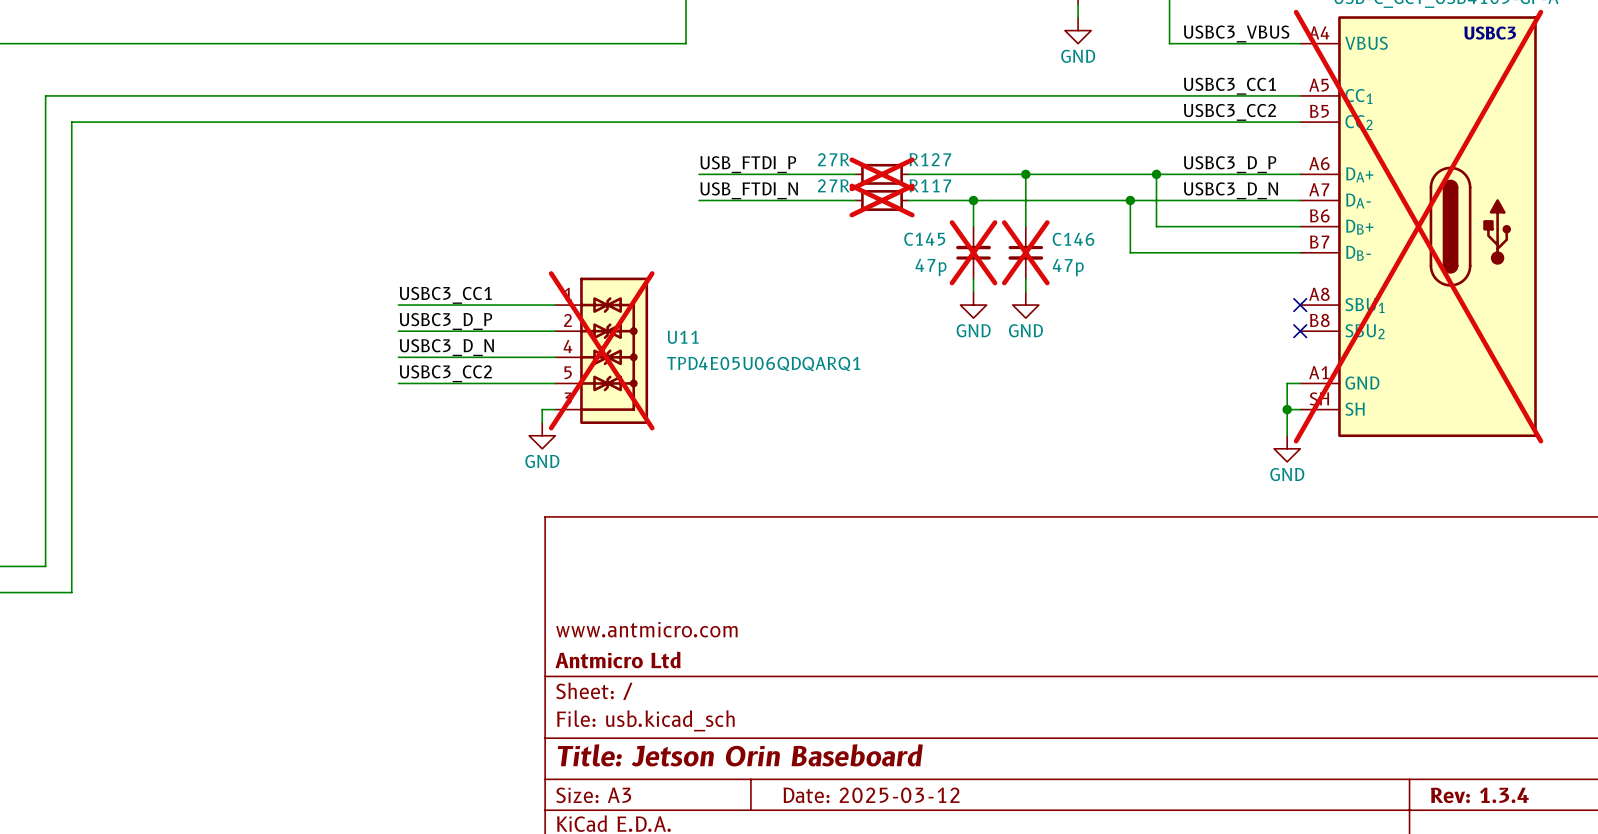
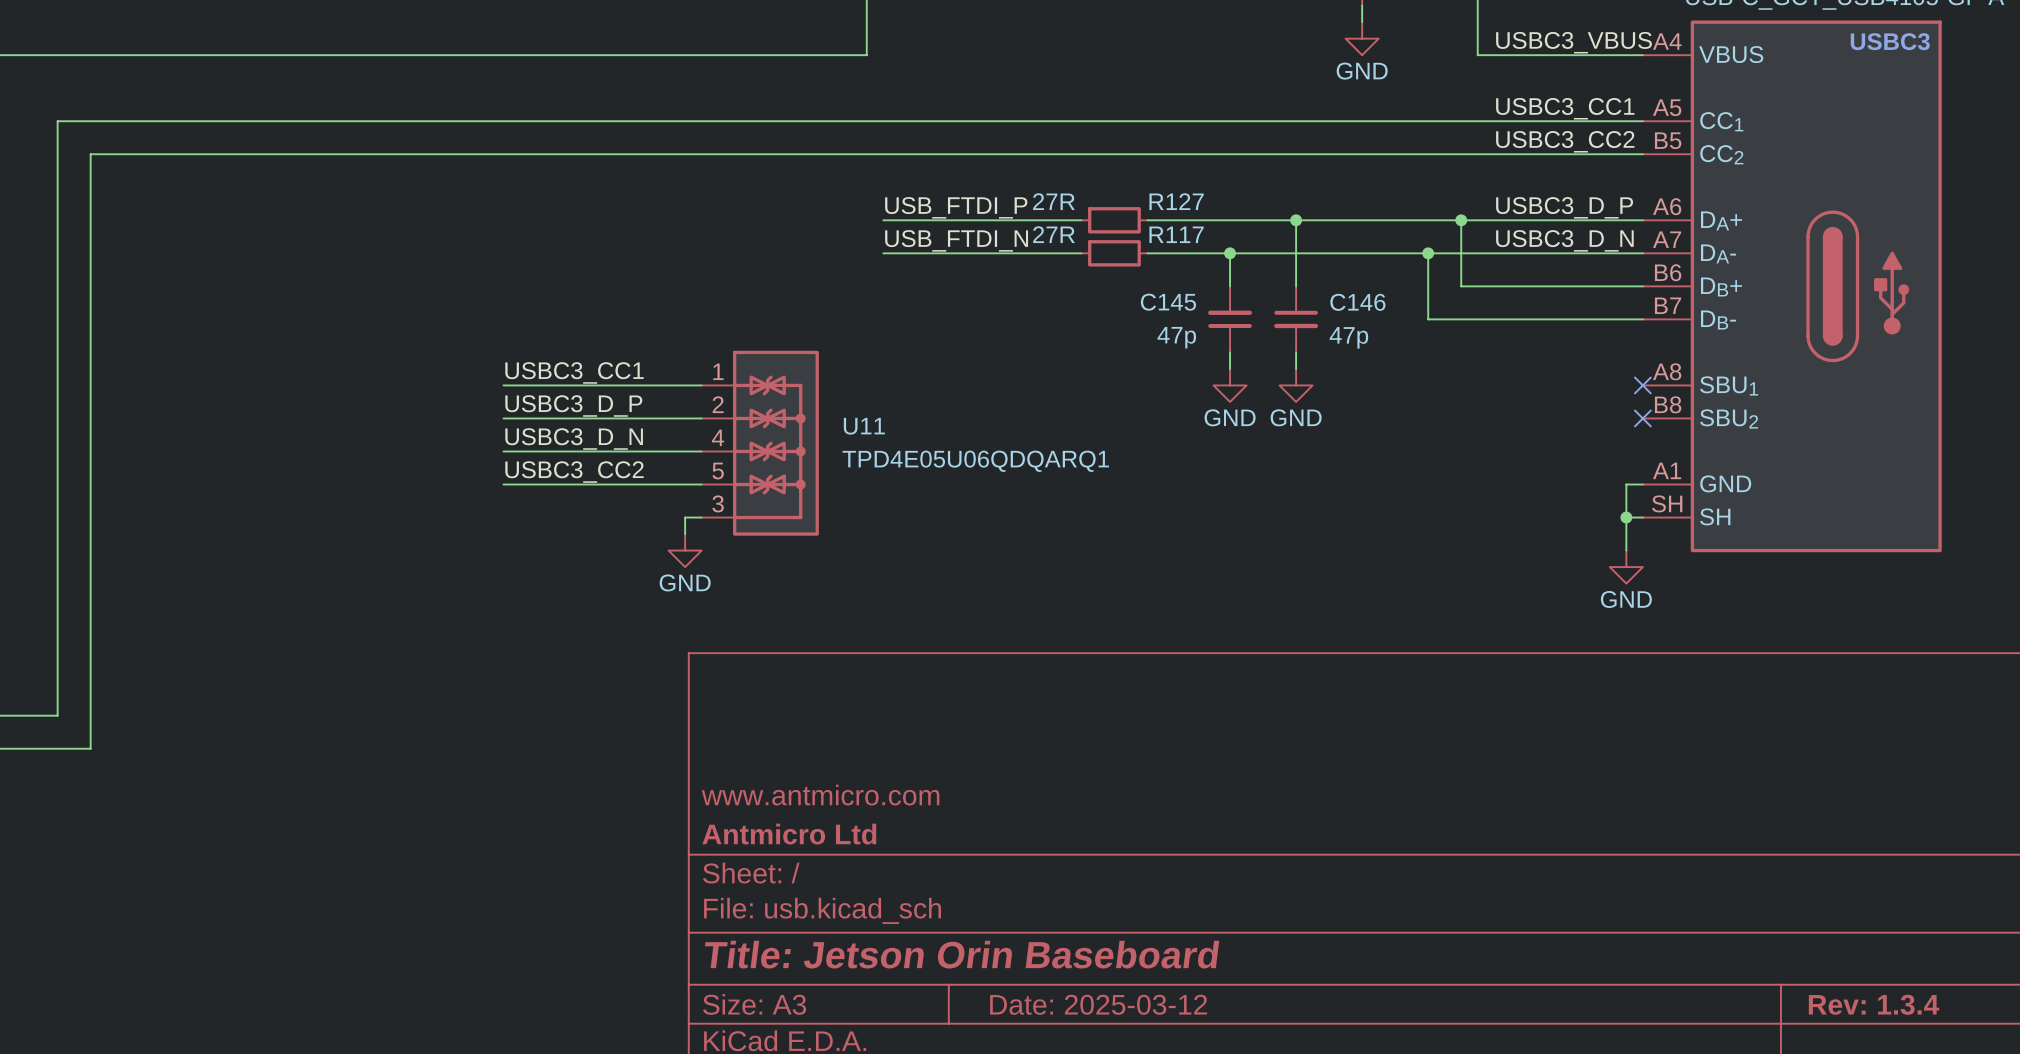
R127 do-not-place cross: (882, 174) -> none
R117 do-not-place cross: (882, 200) -> none
part do-not-place cross: (1418, 226) -> none
C145 do-not-place cross: (973, 252) -> none
C146 do-not-place cross: (1025, 252) -> none
U11 do-not-place cross: (601, 350) -> none

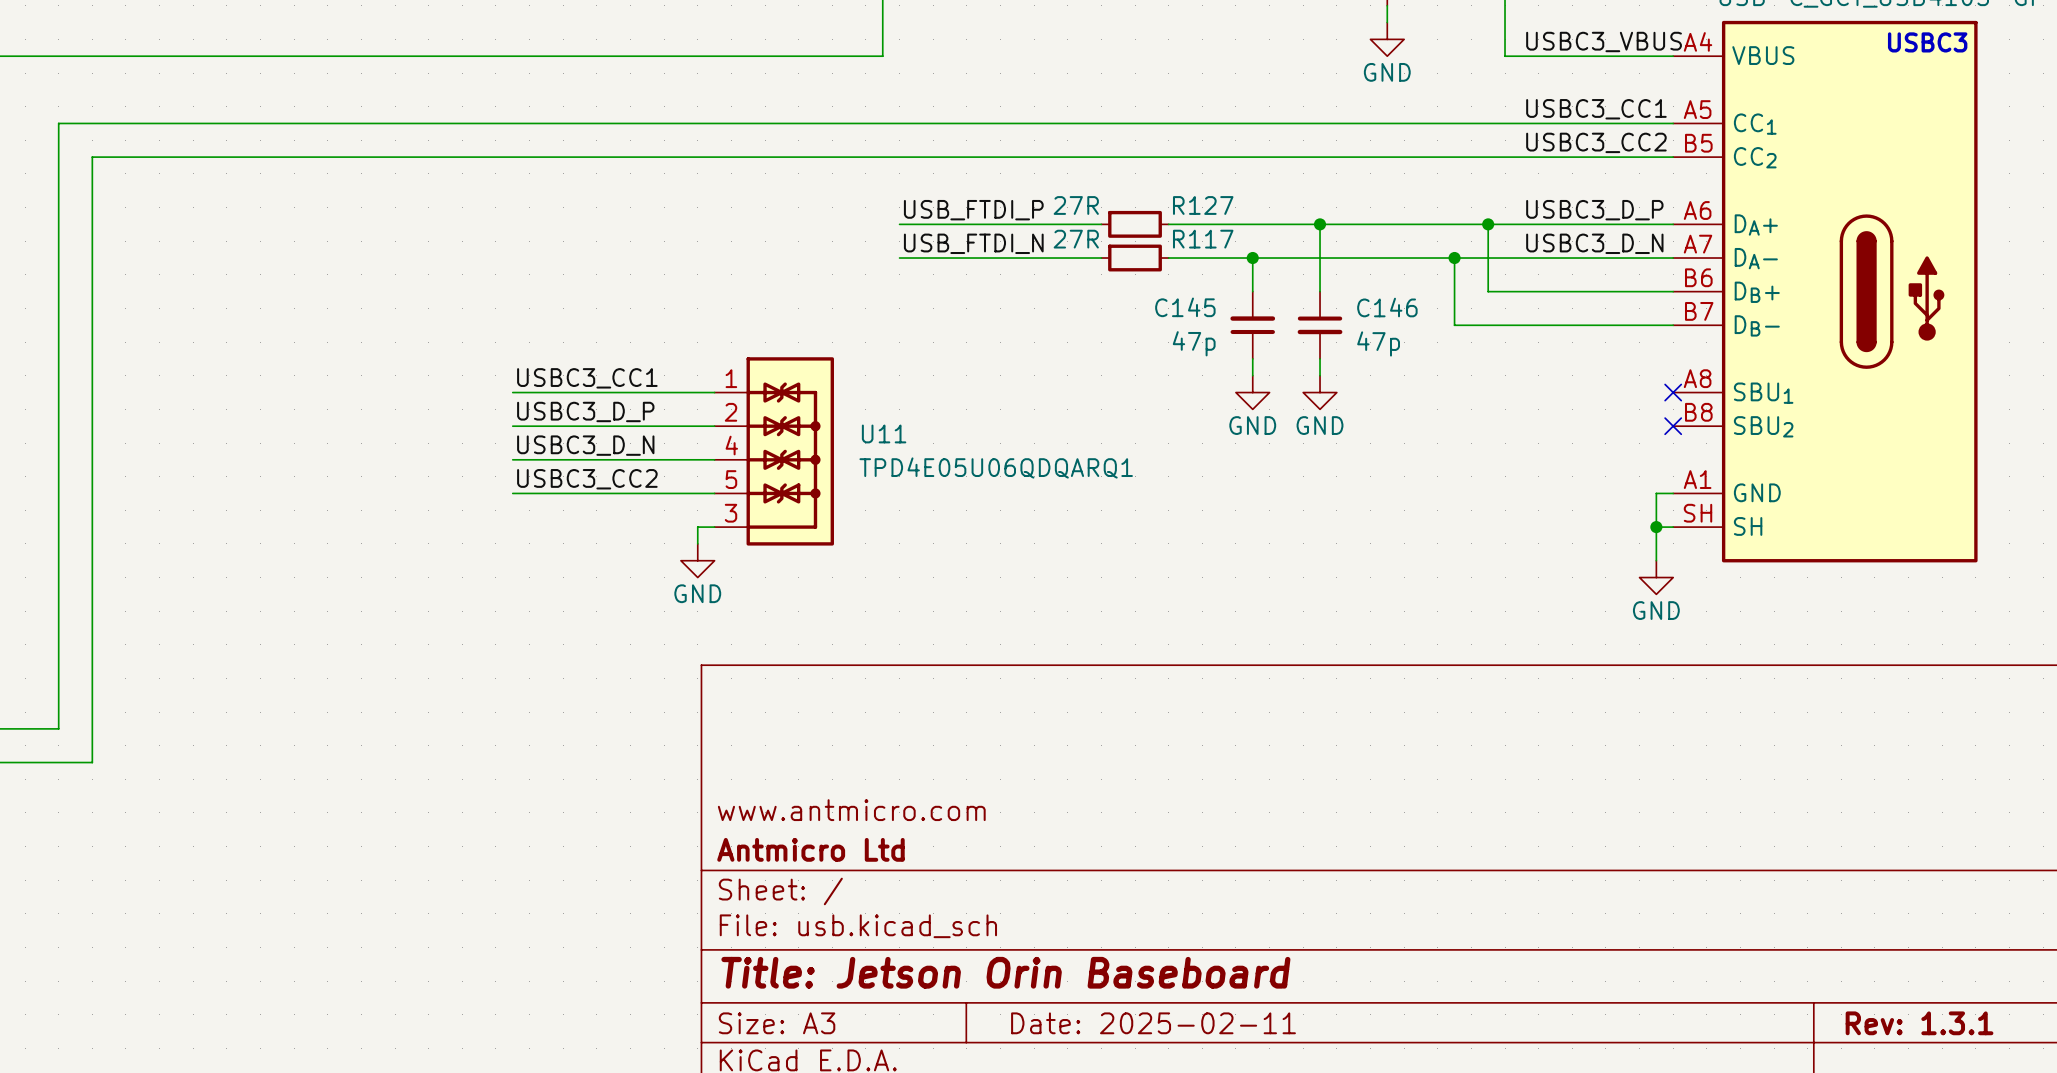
title block: Date: 2025-03-12 (1098, 1004) -> Date: 2025-02-11 (1153, 1023)
title block: Rev: 1.3.4 (1874, 1004) -> Rev: 1.3.1 (1919, 1023)

